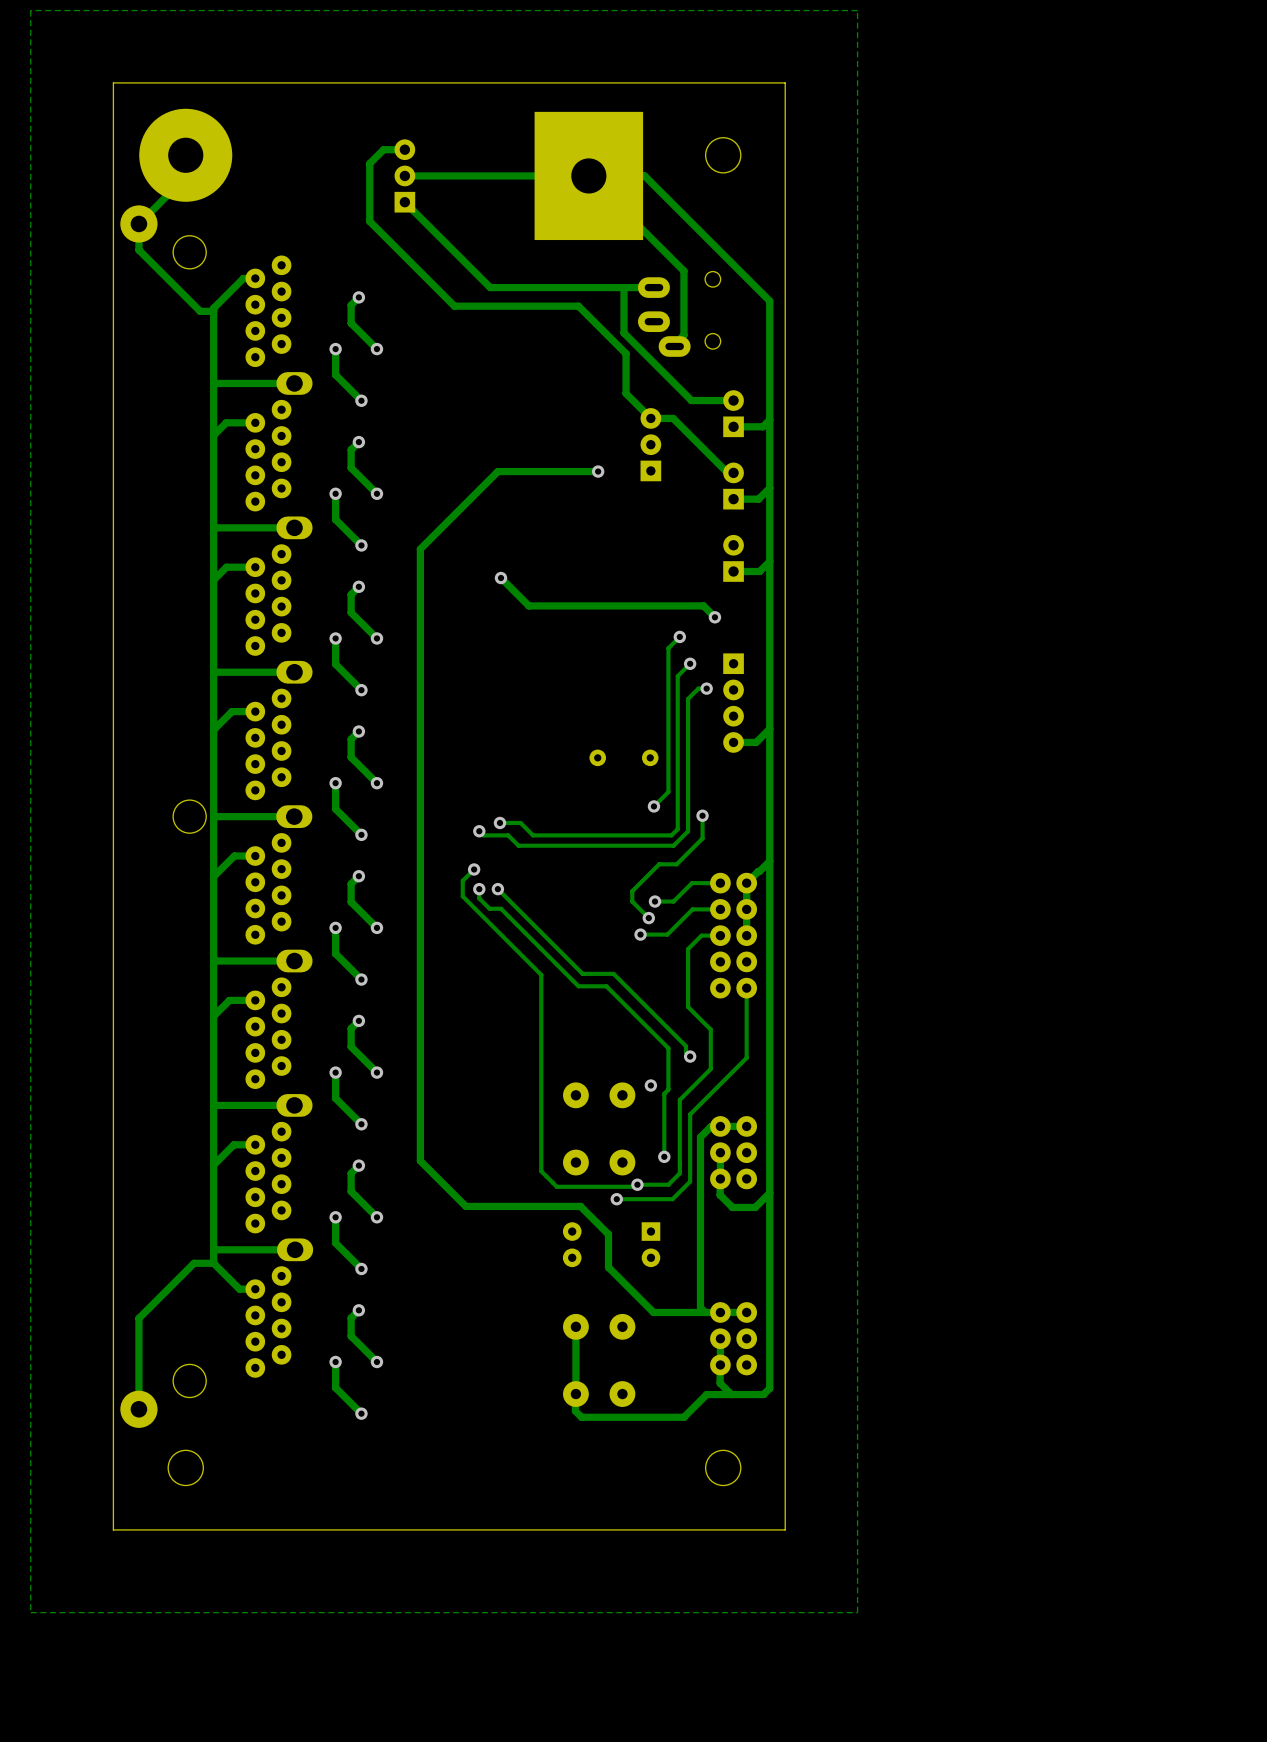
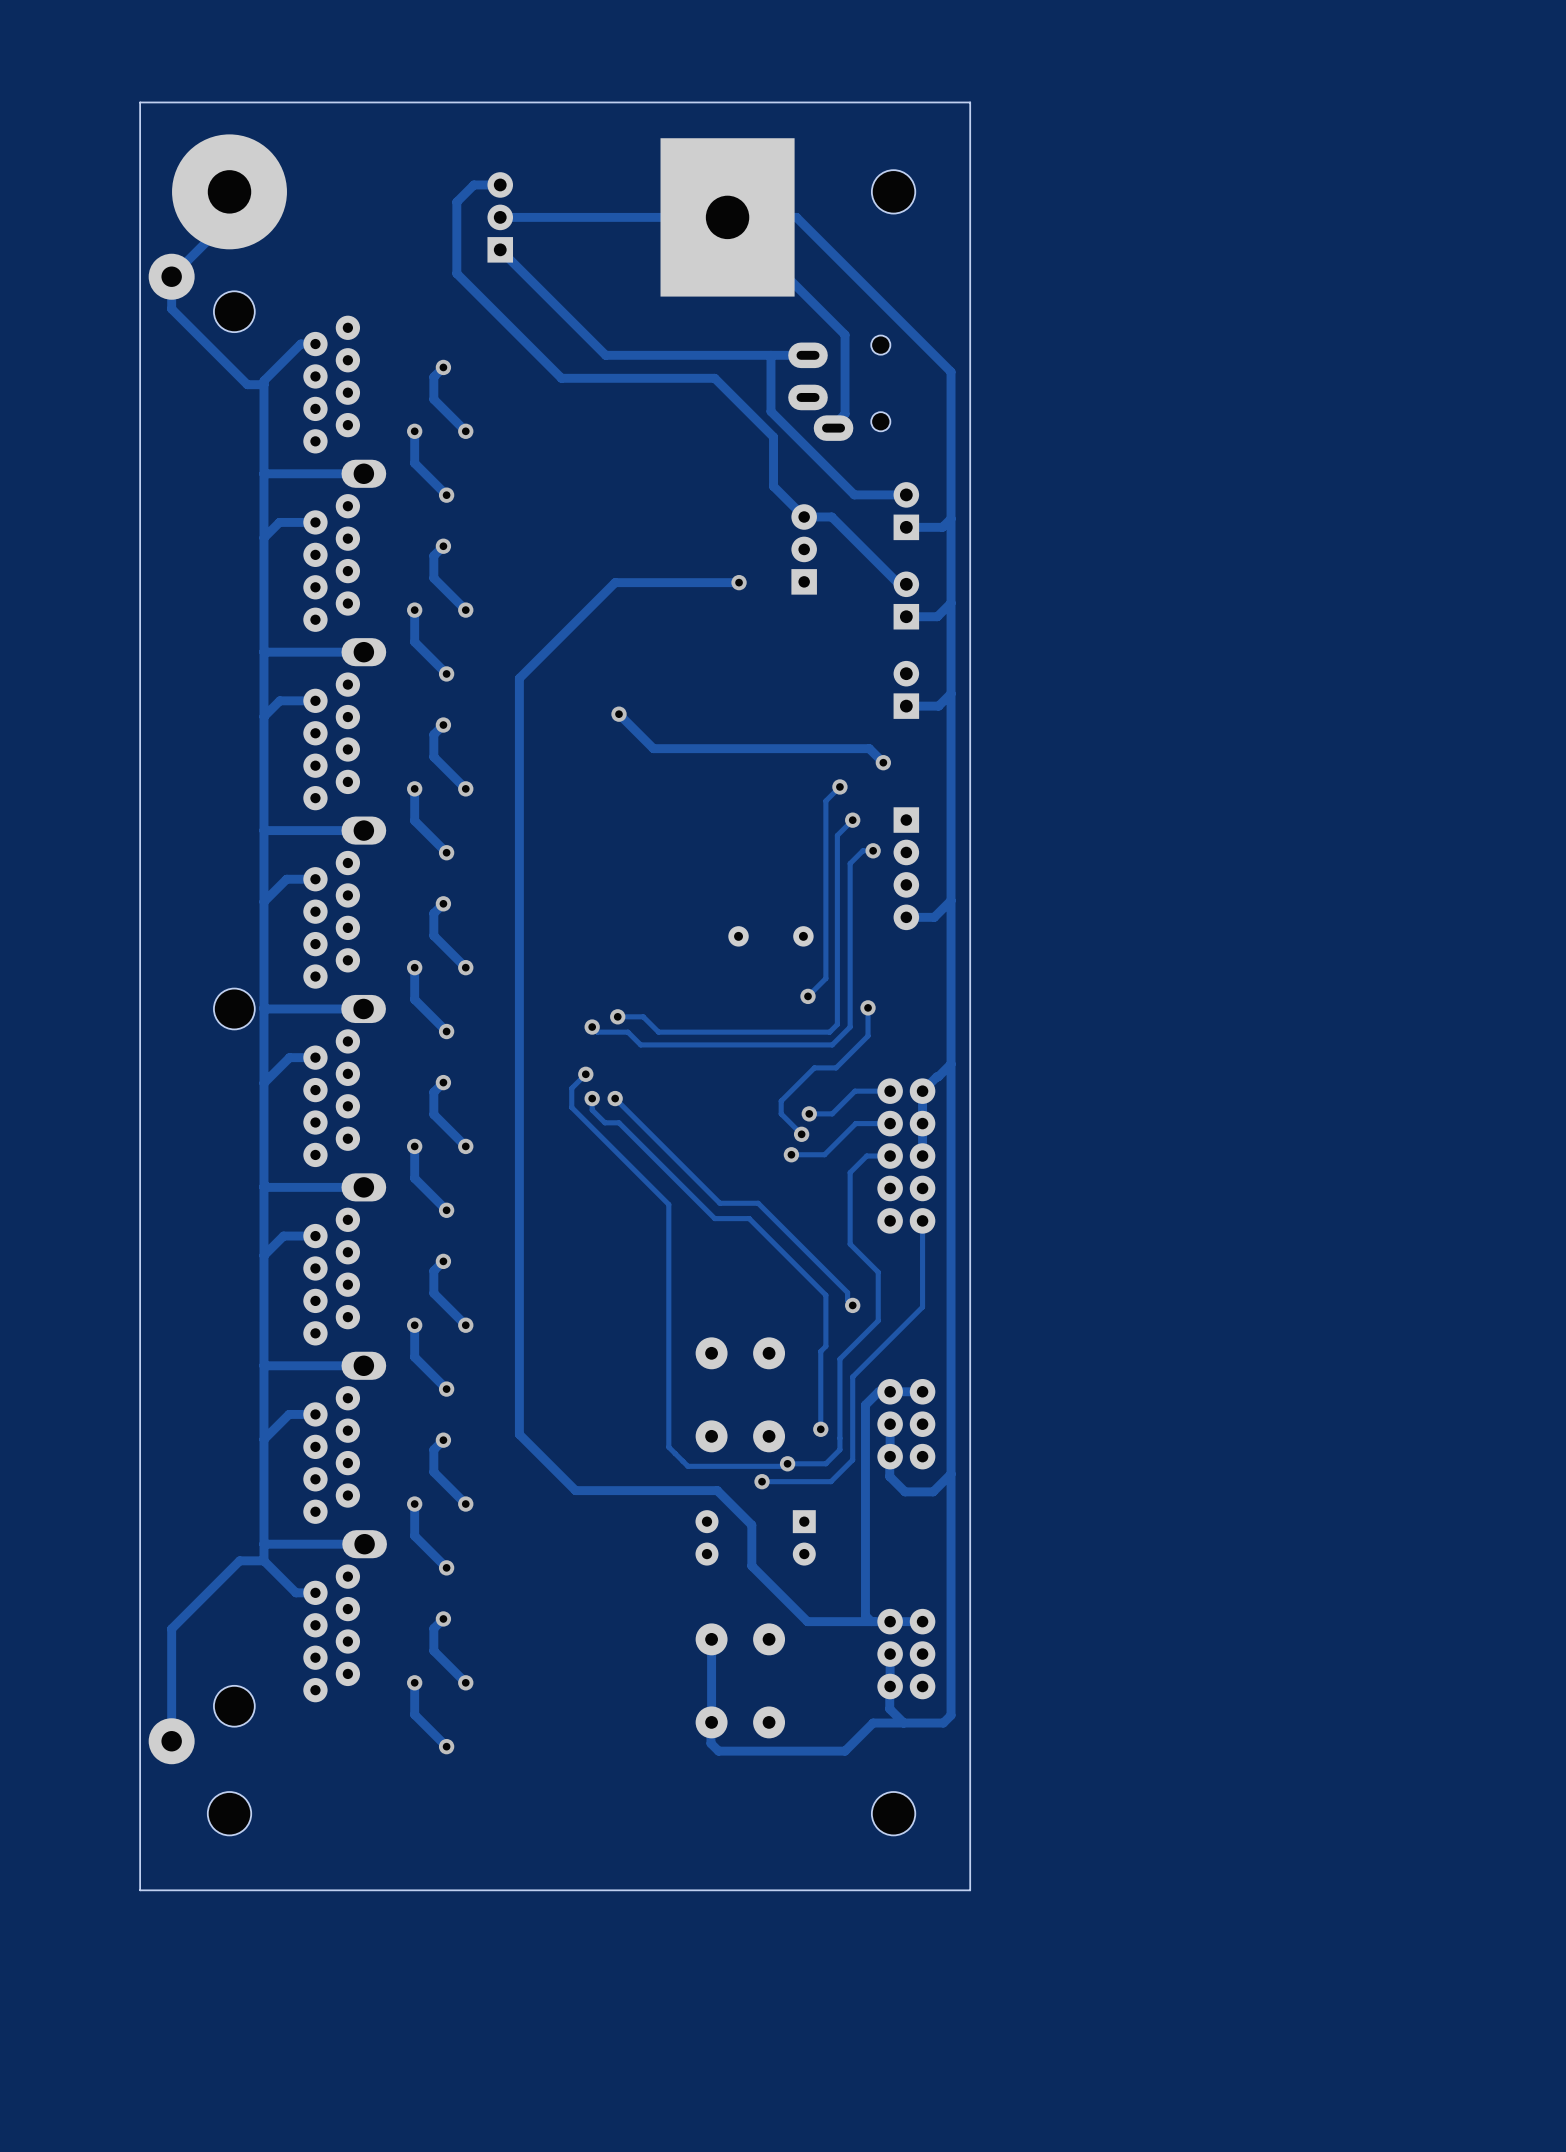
zone outline: (857, 10) (857, 1612) (30, 1612) (30, 10) (857, 10) -> none
via: (650, 1085) -> none

